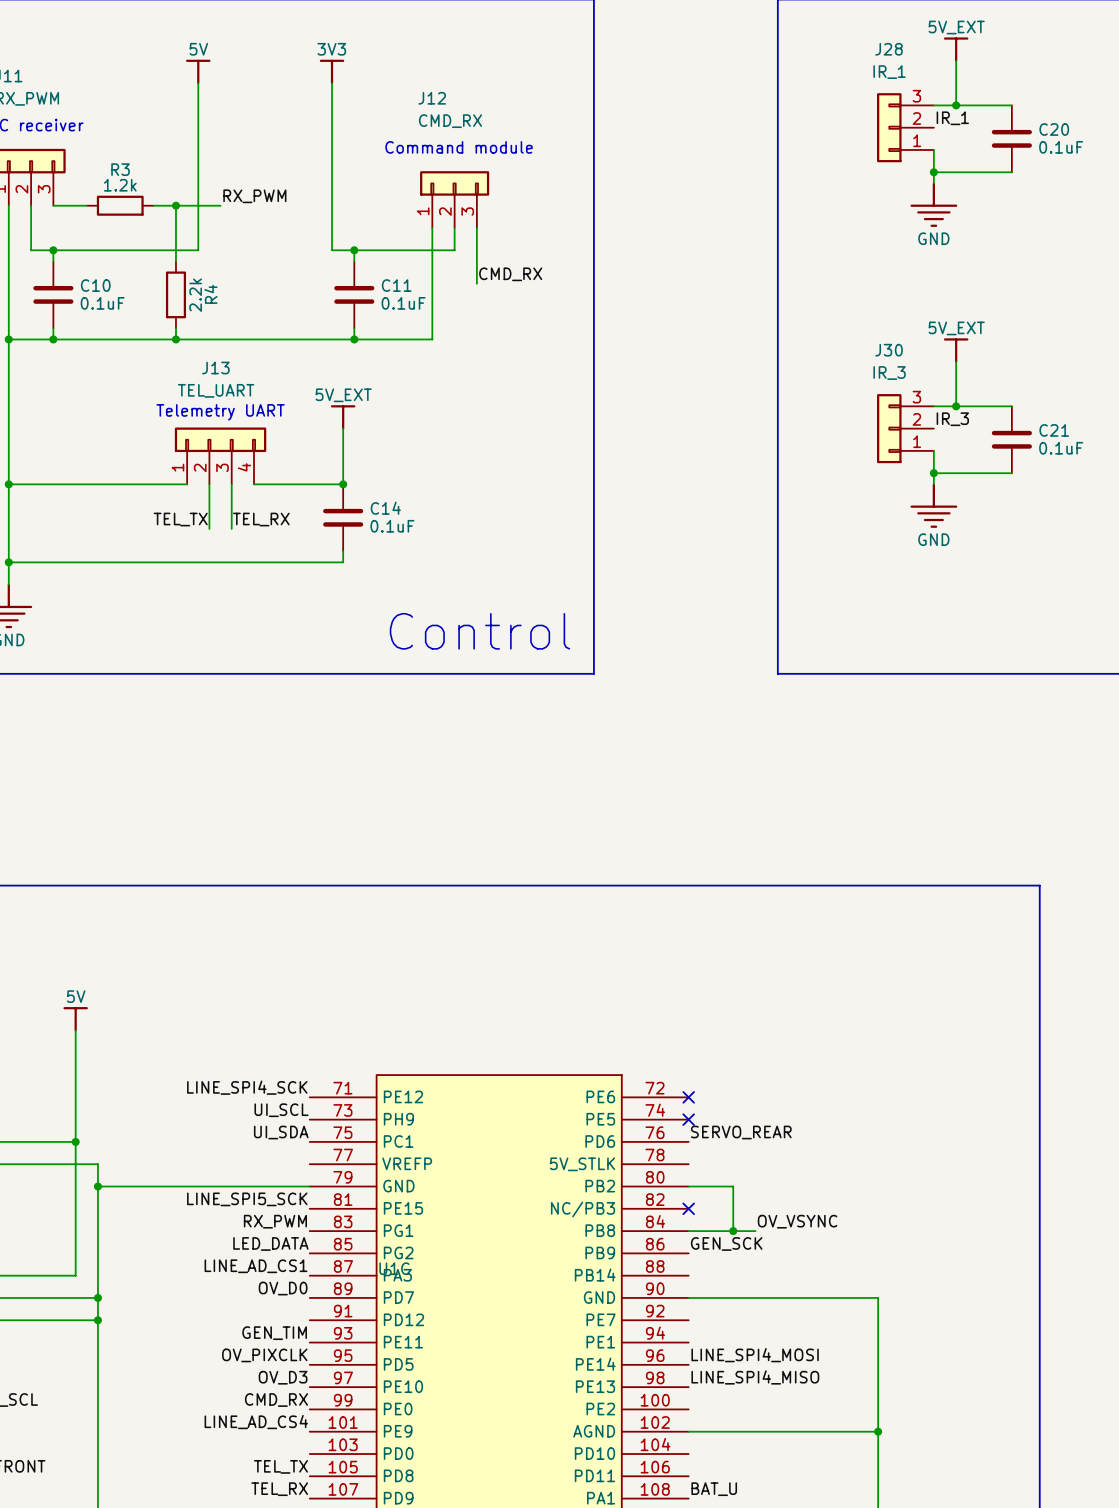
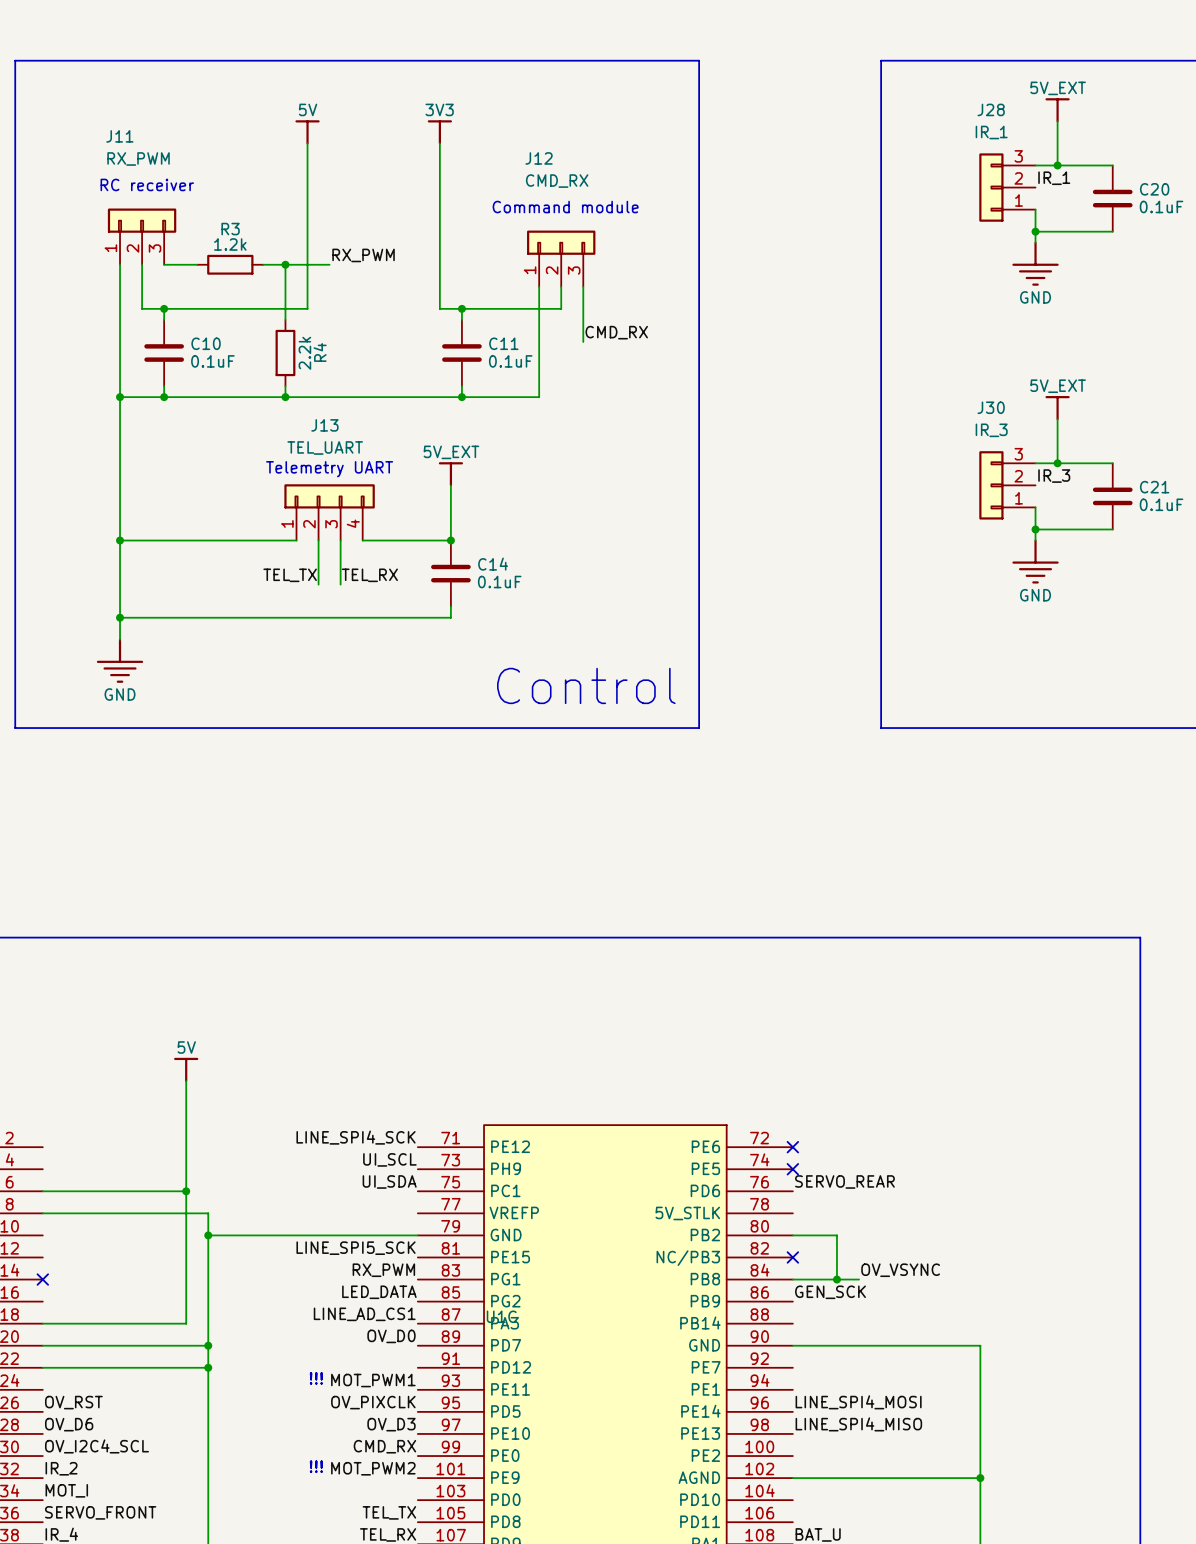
text: none -> !!! (316, 1378)
label: GEN_TIM (274, 1333) -> MOT_PWM1 (373, 1380)
text: none -> !!! (316, 1466)
label: LINE_AD_CS4 (256, 1422) -> MOT_PWM2 (373, 1468)

